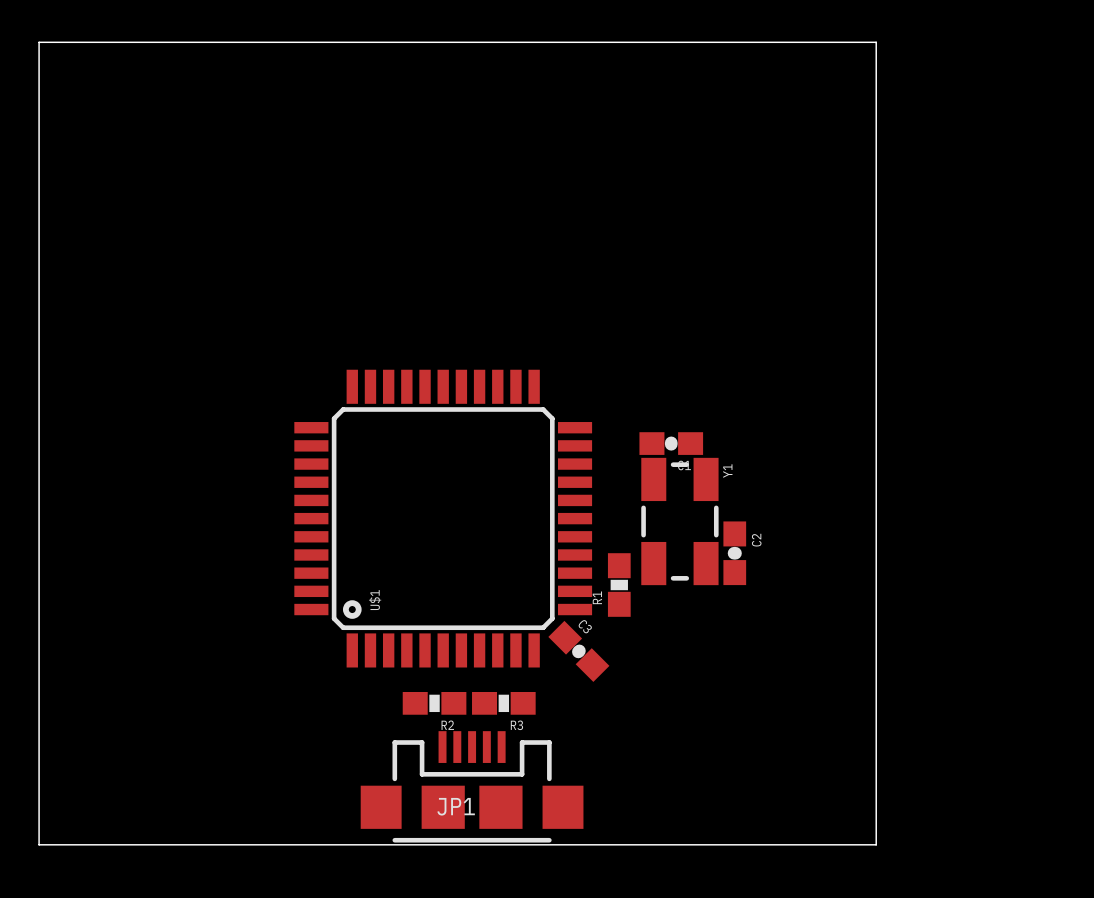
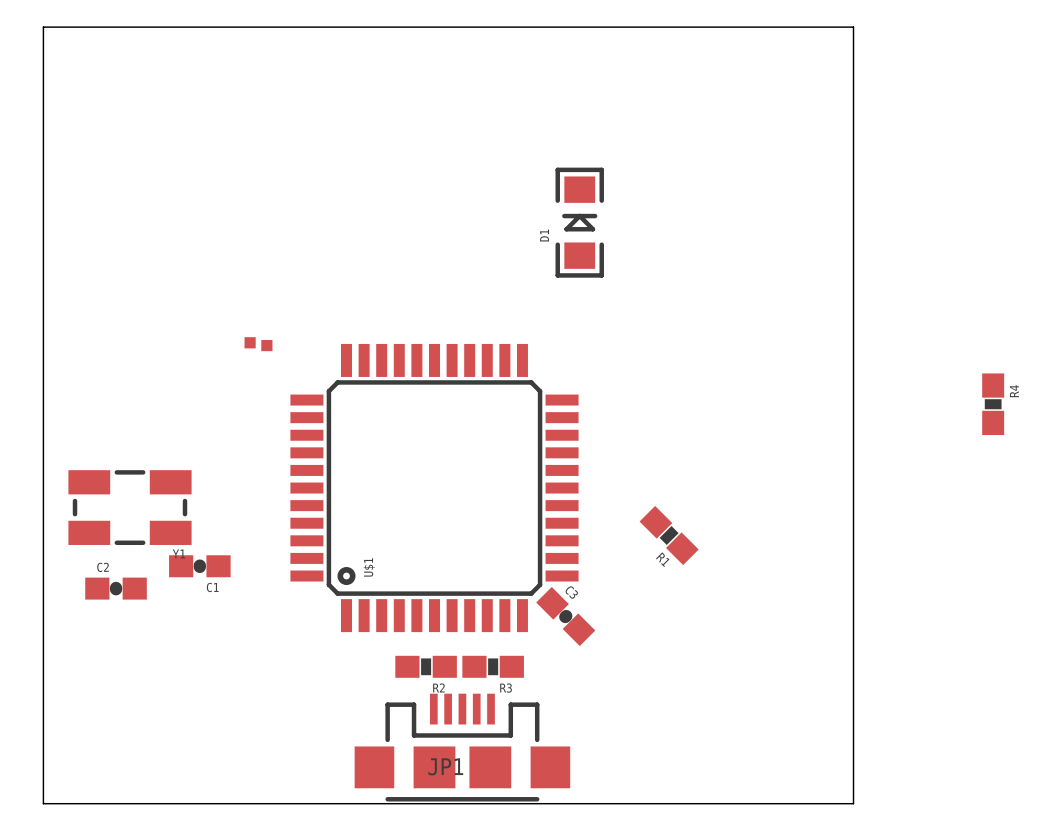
D1: none -> (579, 222)
part: none -> (250, 342)
part: none -> (266, 345)
R4: none -> (993, 404)
C1 position: (671, 443) -> (199, 566)
Y1 rotation: 0° (679, 521) -> 90° clockwise (130, 507)
Y1 position: (679, 521) -> (130, 507)
C2 rotation: 0° (734, 553) -> 90° clockwise (116, 588)
C2 position: (734, 553) -> (116, 588)
R1 rotation: 0° (619, 585) -> 45° counterclockwise (669, 535)
R1 position: (619, 585) -> (669, 535)

